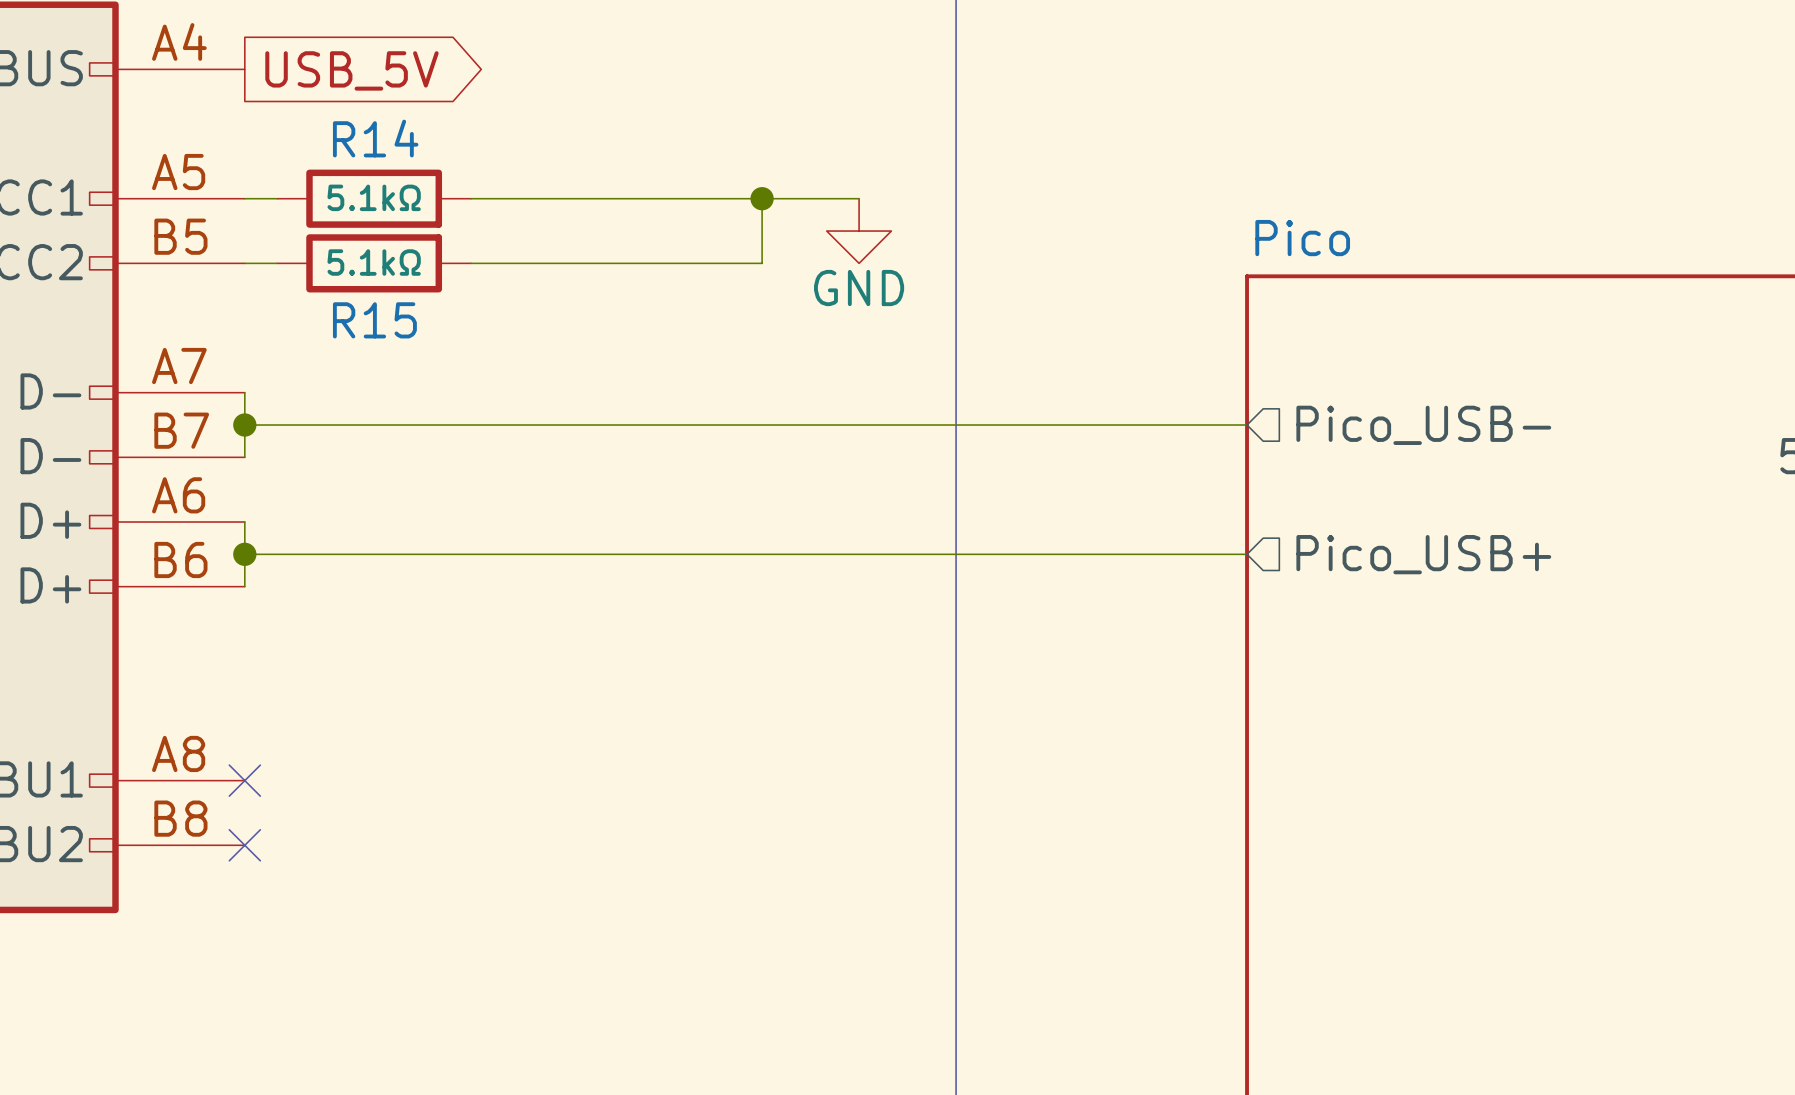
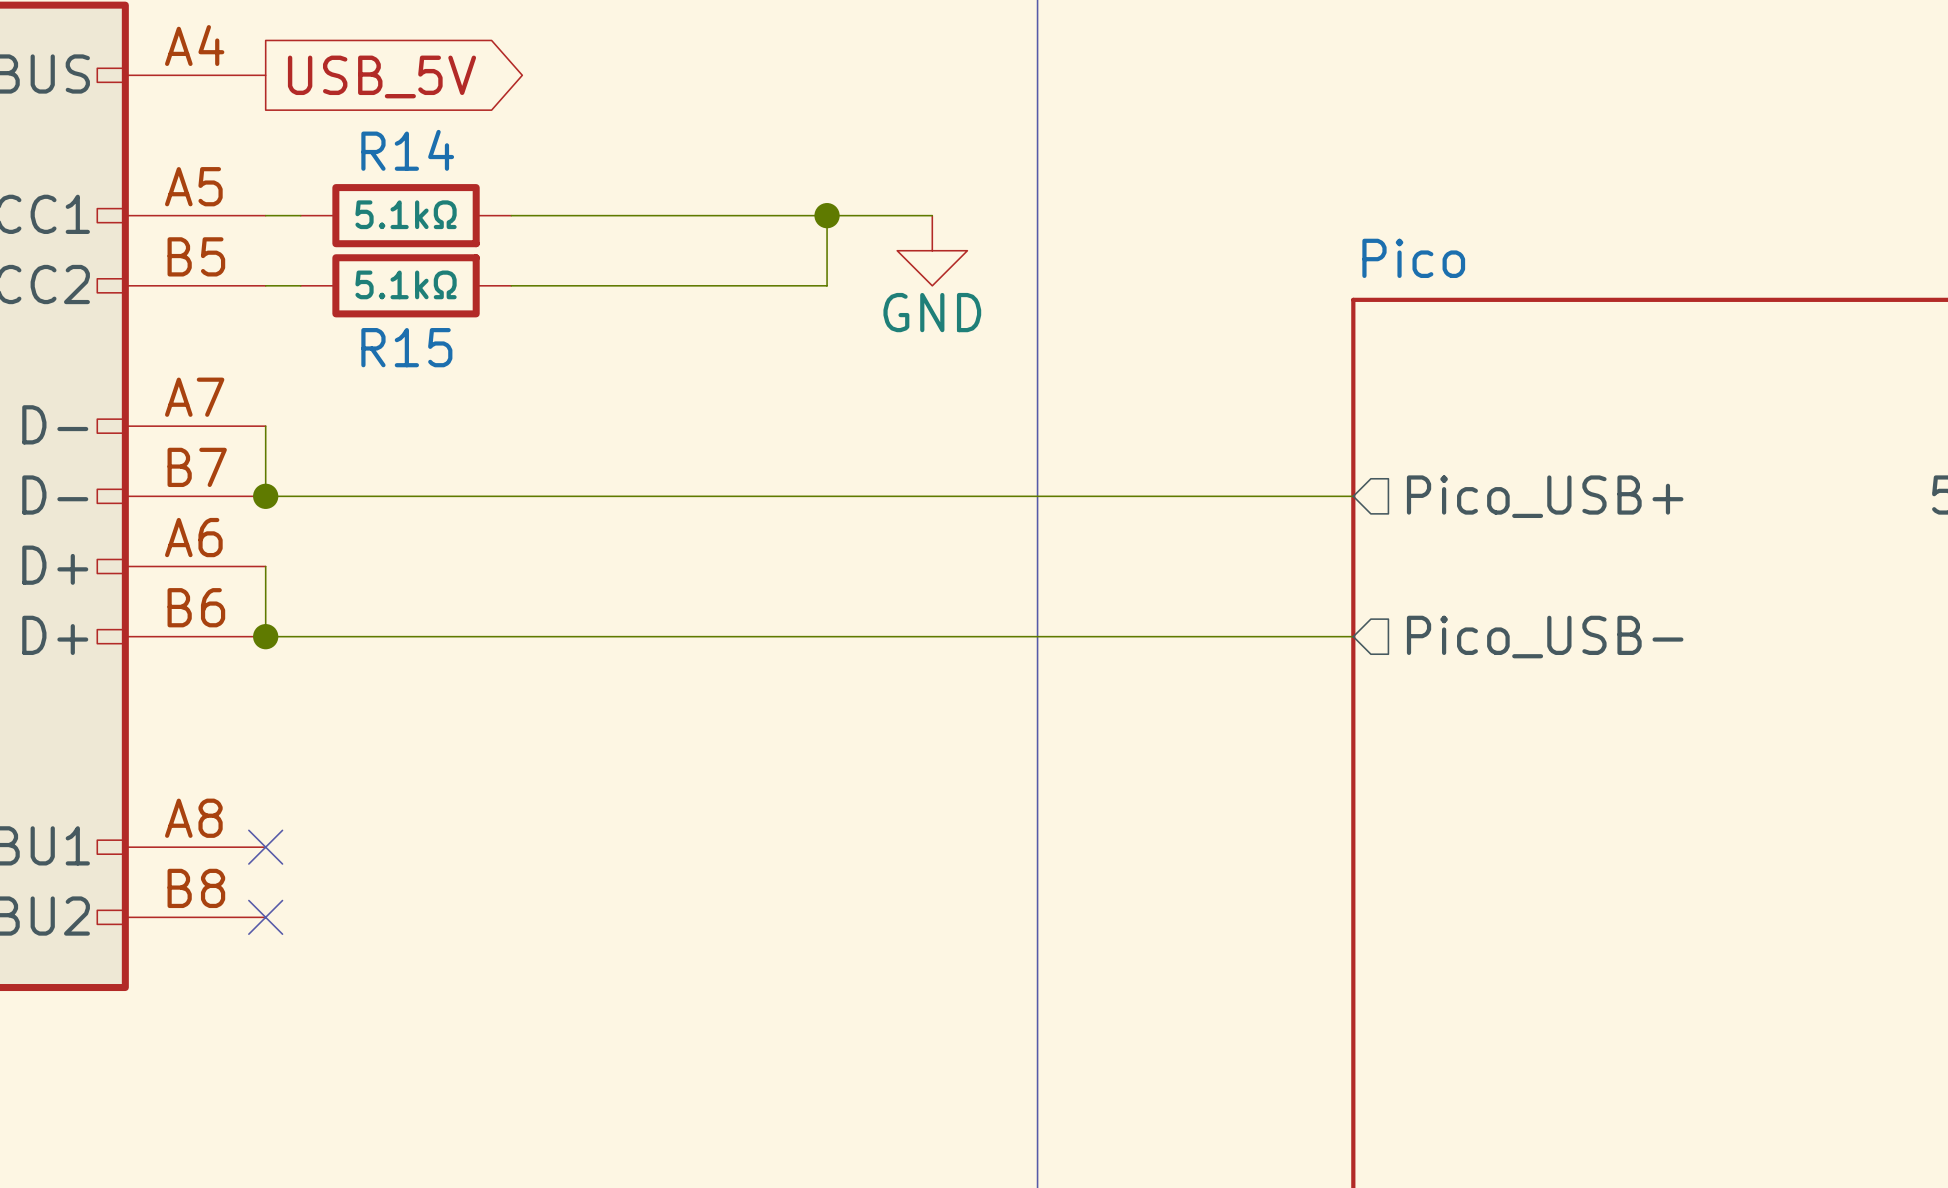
wire: (244, 425) (1247, 425) -> (265, 496) (1353, 496)
junction position: (244, 425) -> (265, 496)
sheet pin position: Pico_USB- (1423, 425) -> Pico_USB- (1545, 637)
wire: (244, 554) (1247, 554) -> (265, 636) (1353, 636)
junction position: (244, 554) -> (265, 636)
sheet pin position: Pico_USB+ (1423, 554) -> Pico_USB+ (1545, 496)

